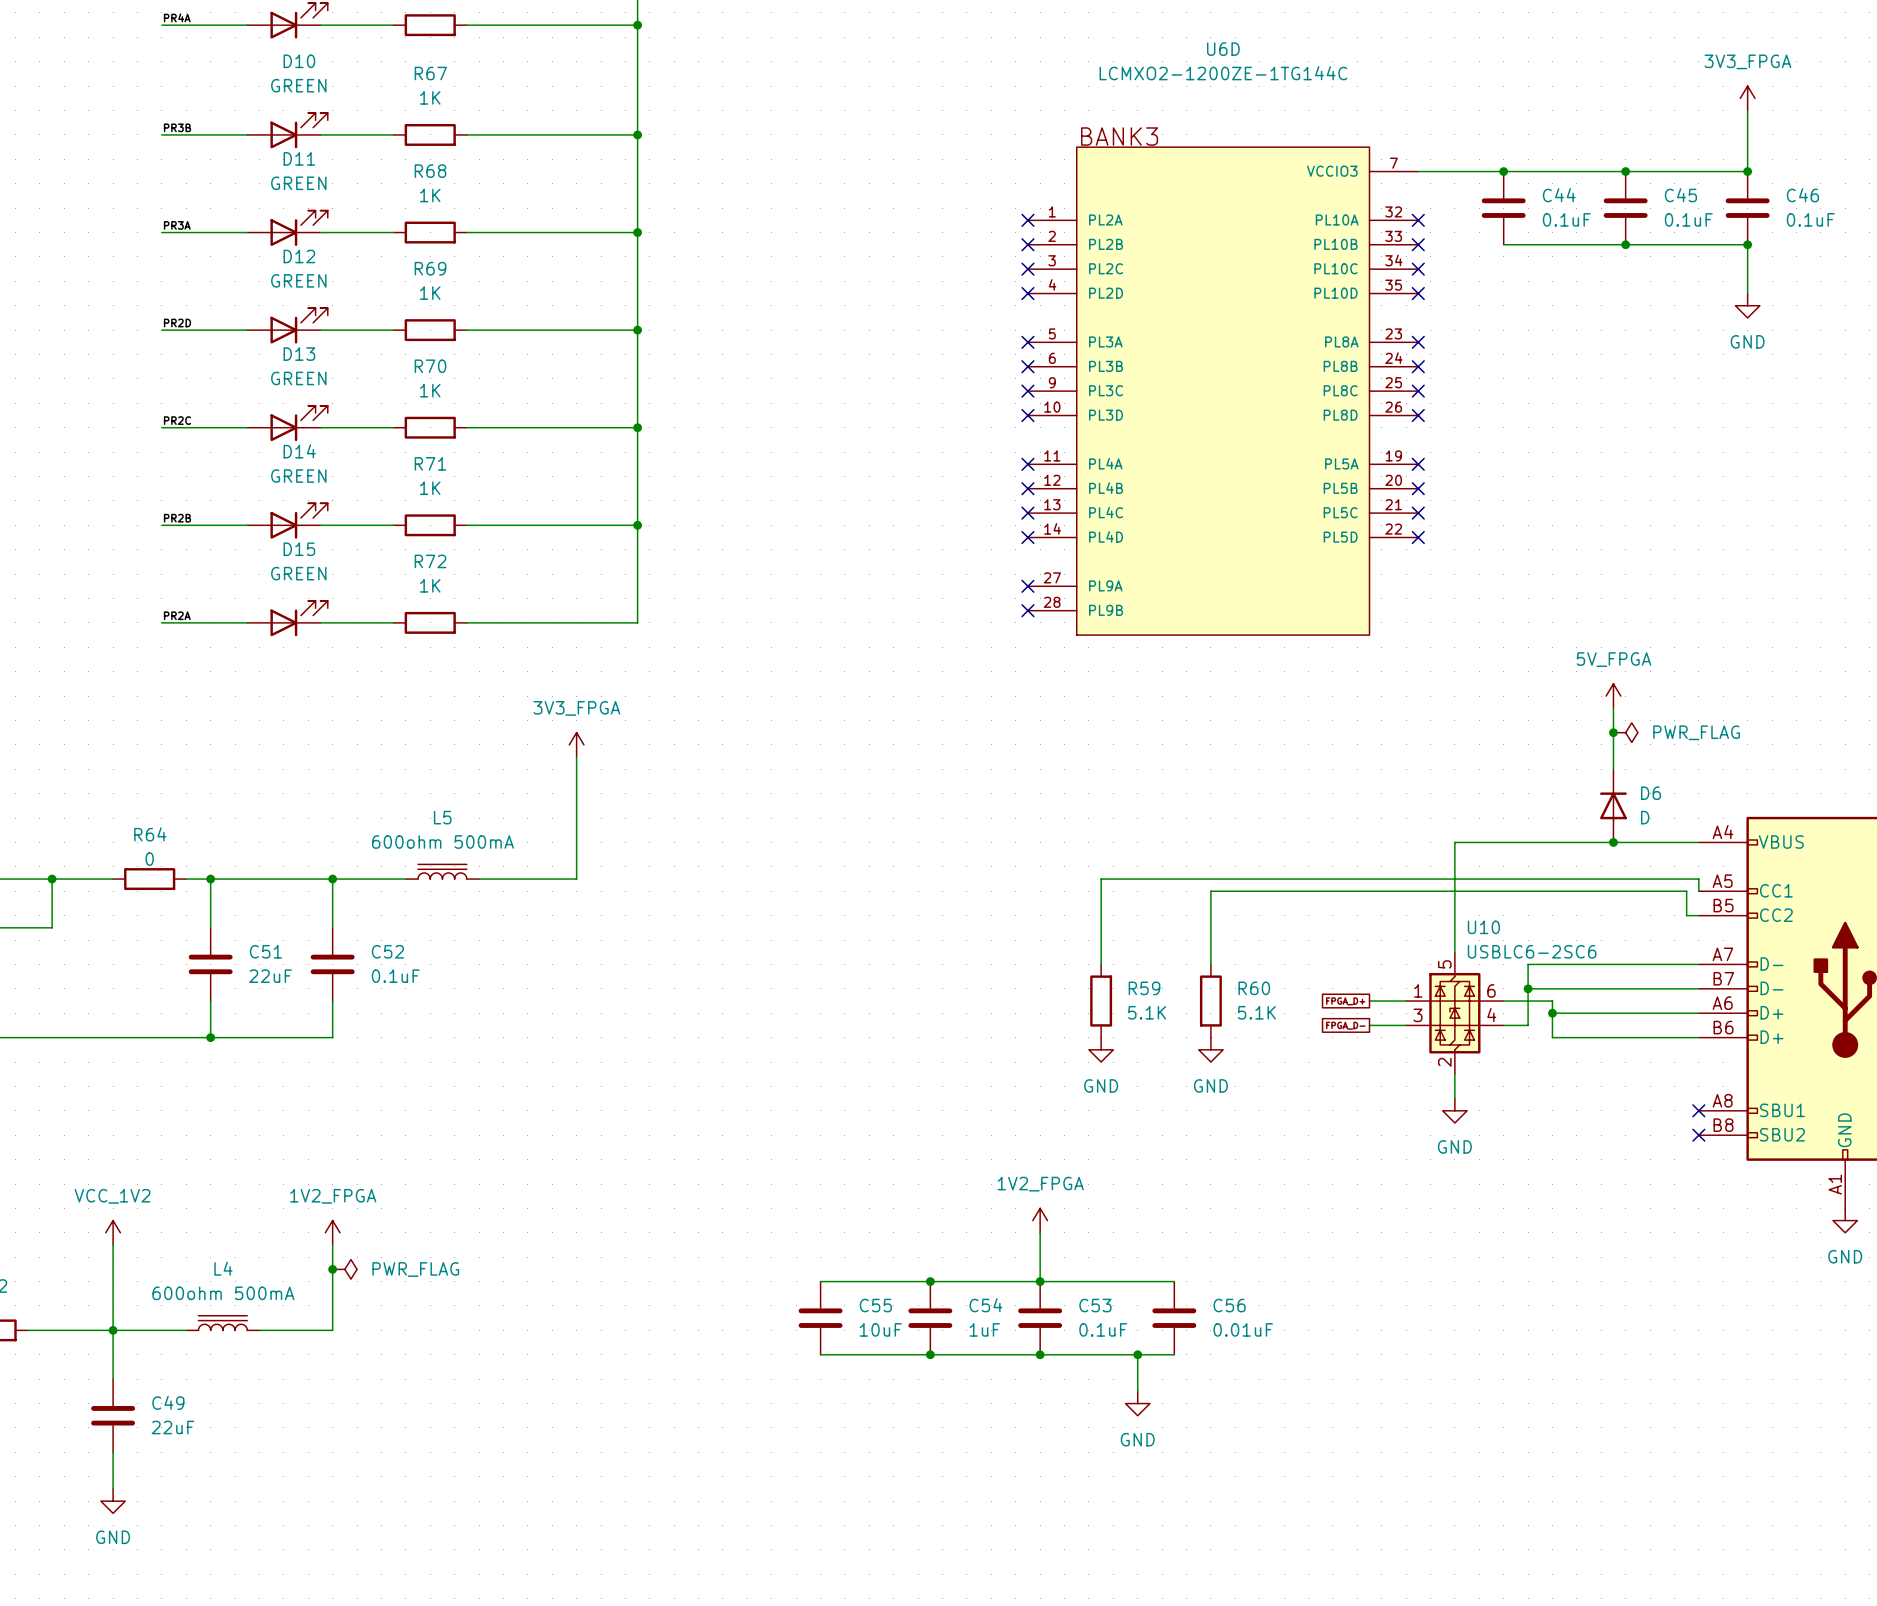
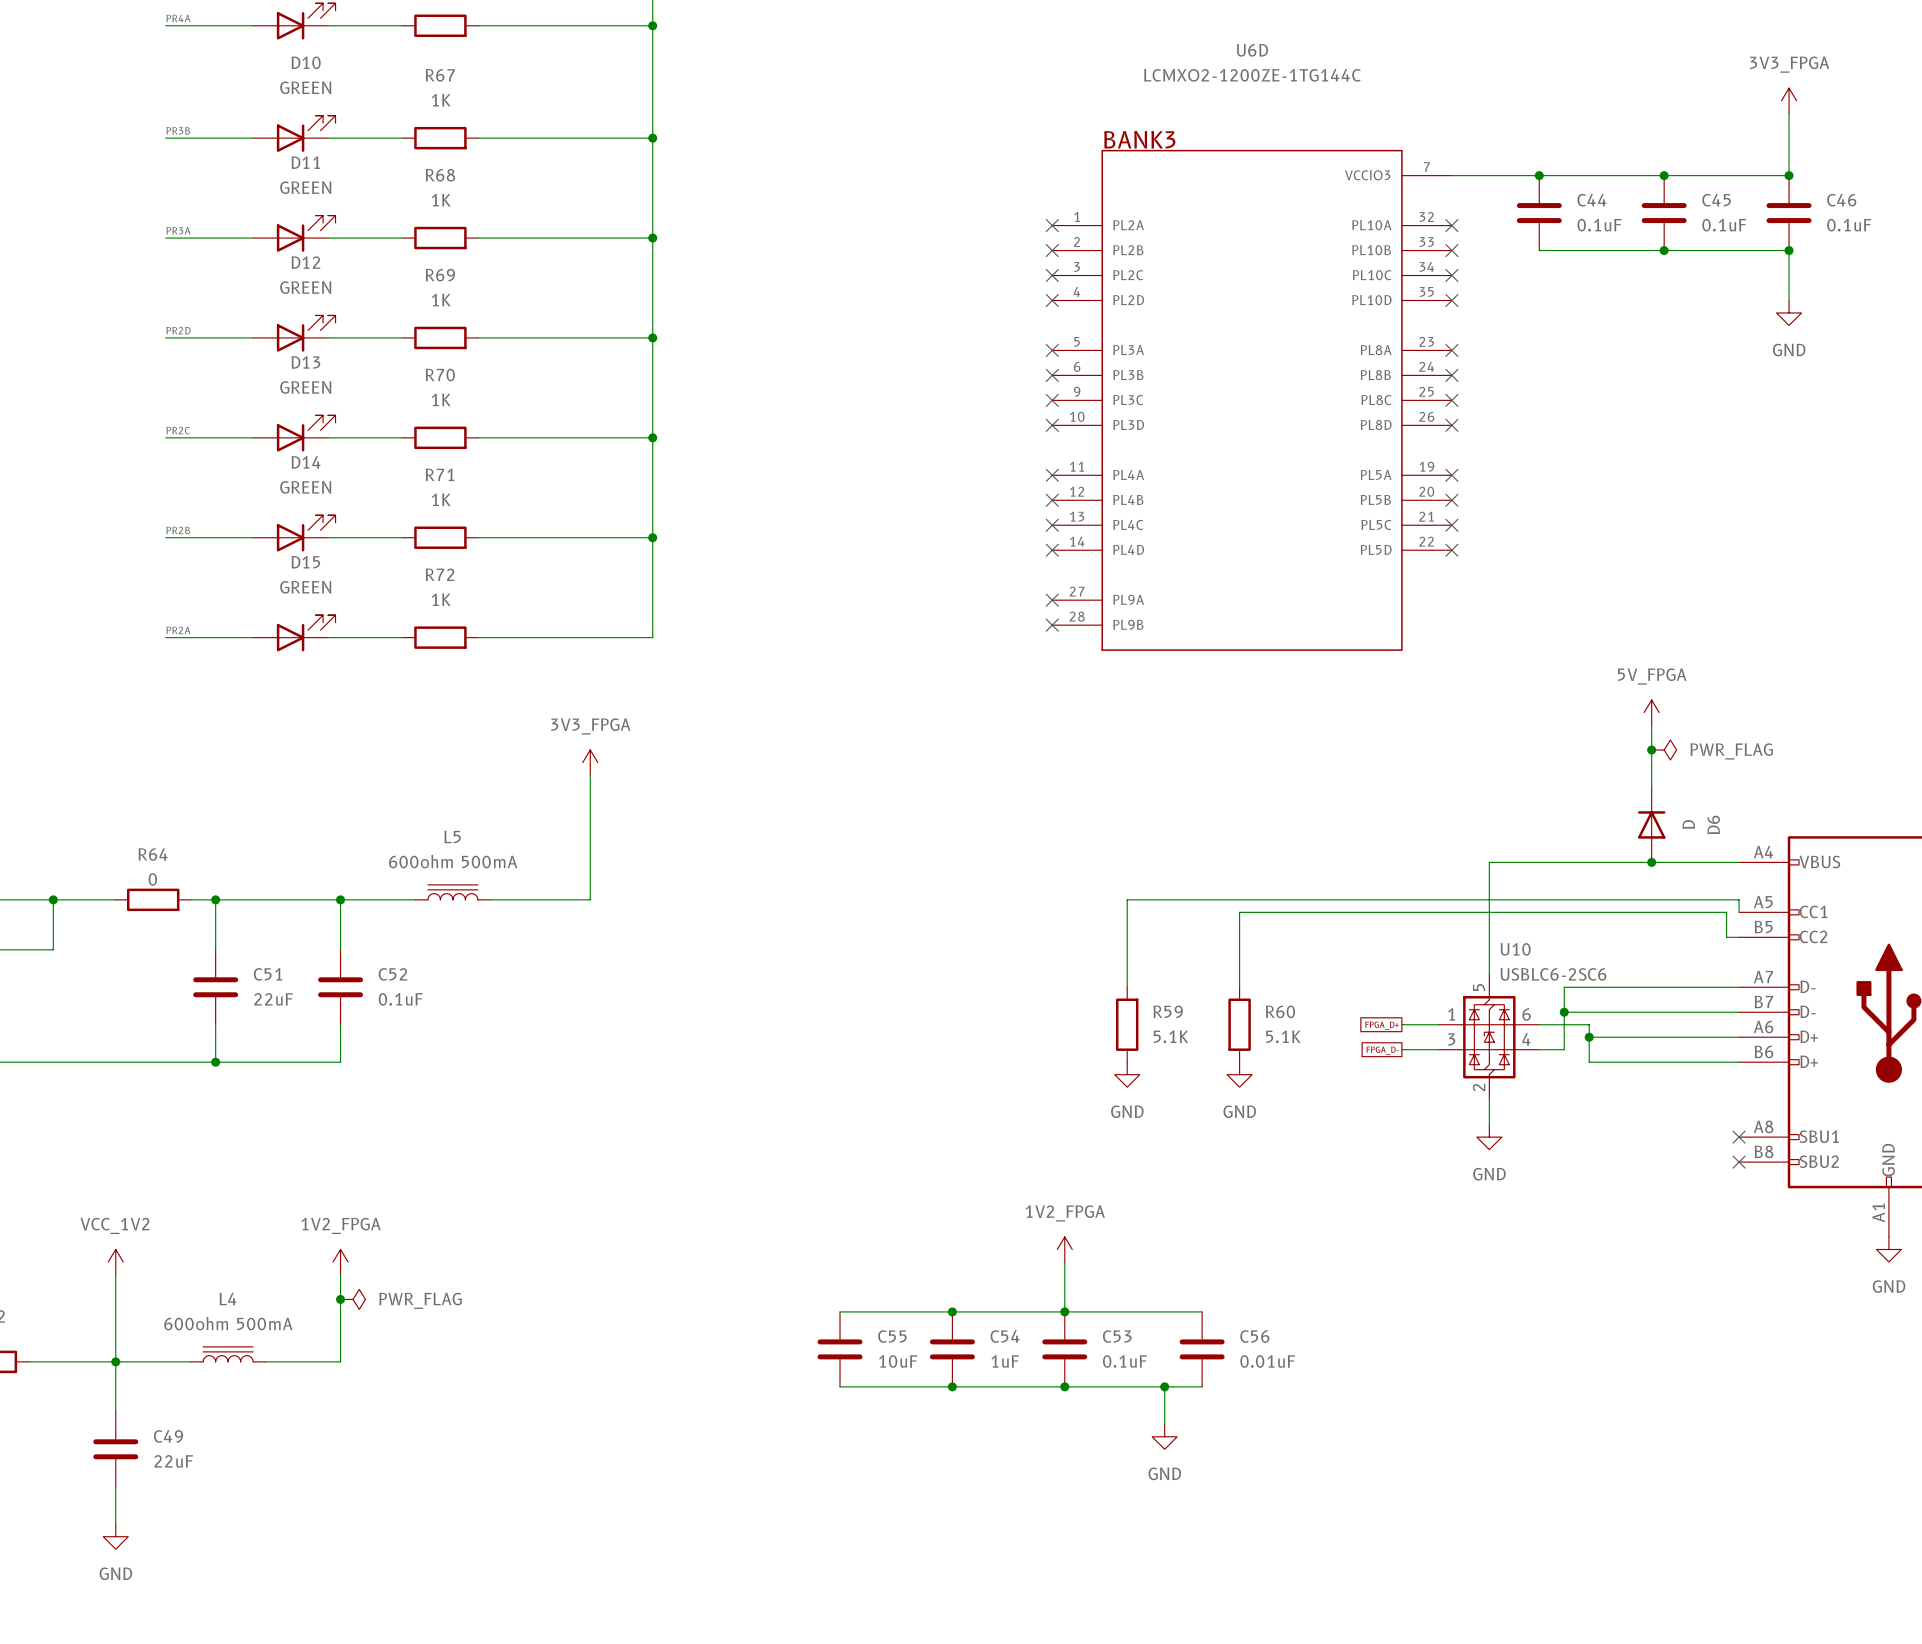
D6 name rotation: 0° (1651, 793) -> 90° counterclockwise (1713, 824)
D6 value rotation: 0° (1645, 817) -> 90° counterclockwise (1688, 824)

